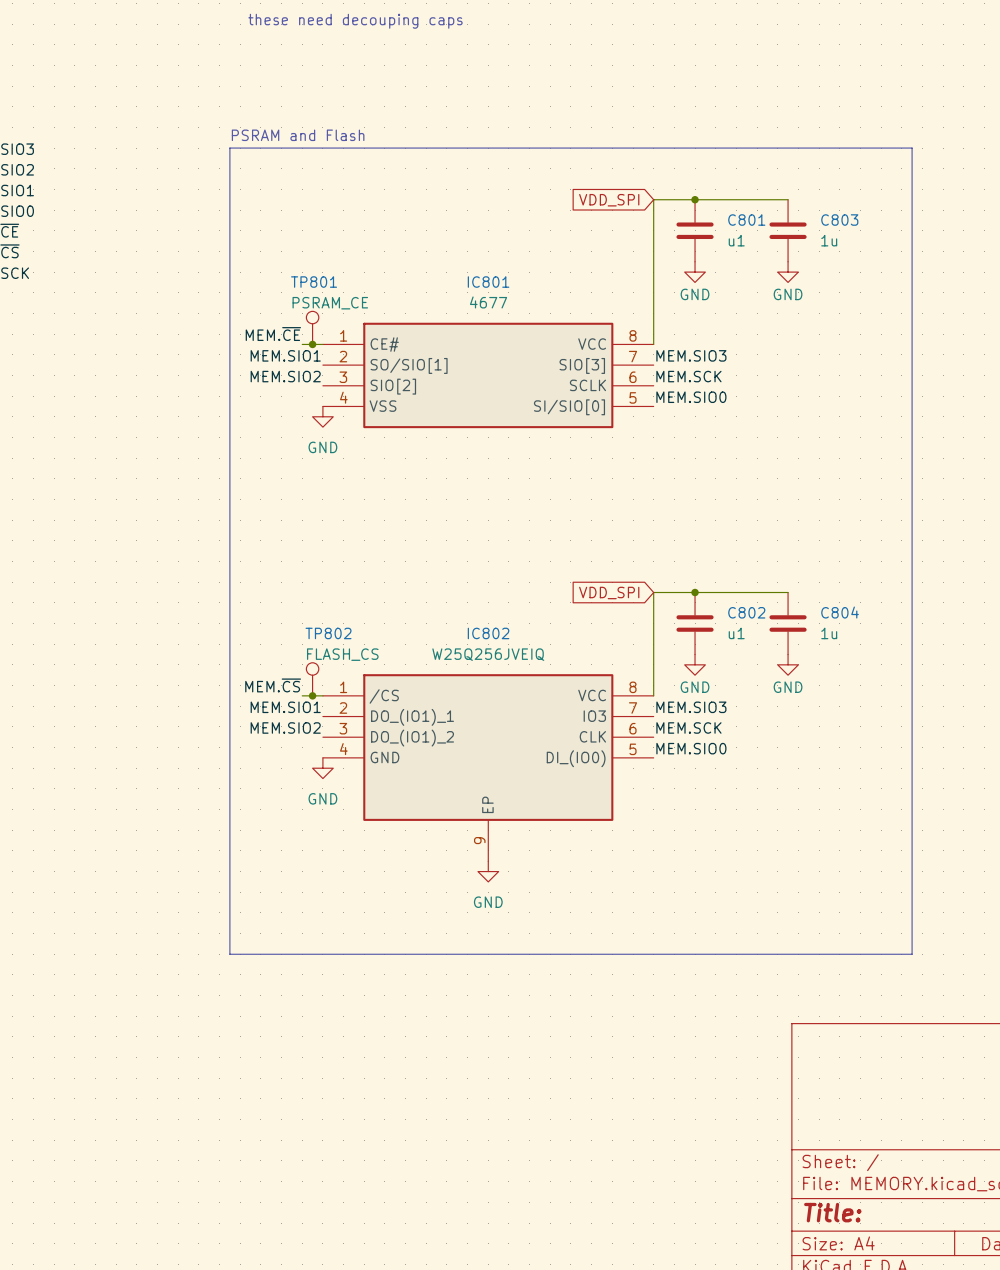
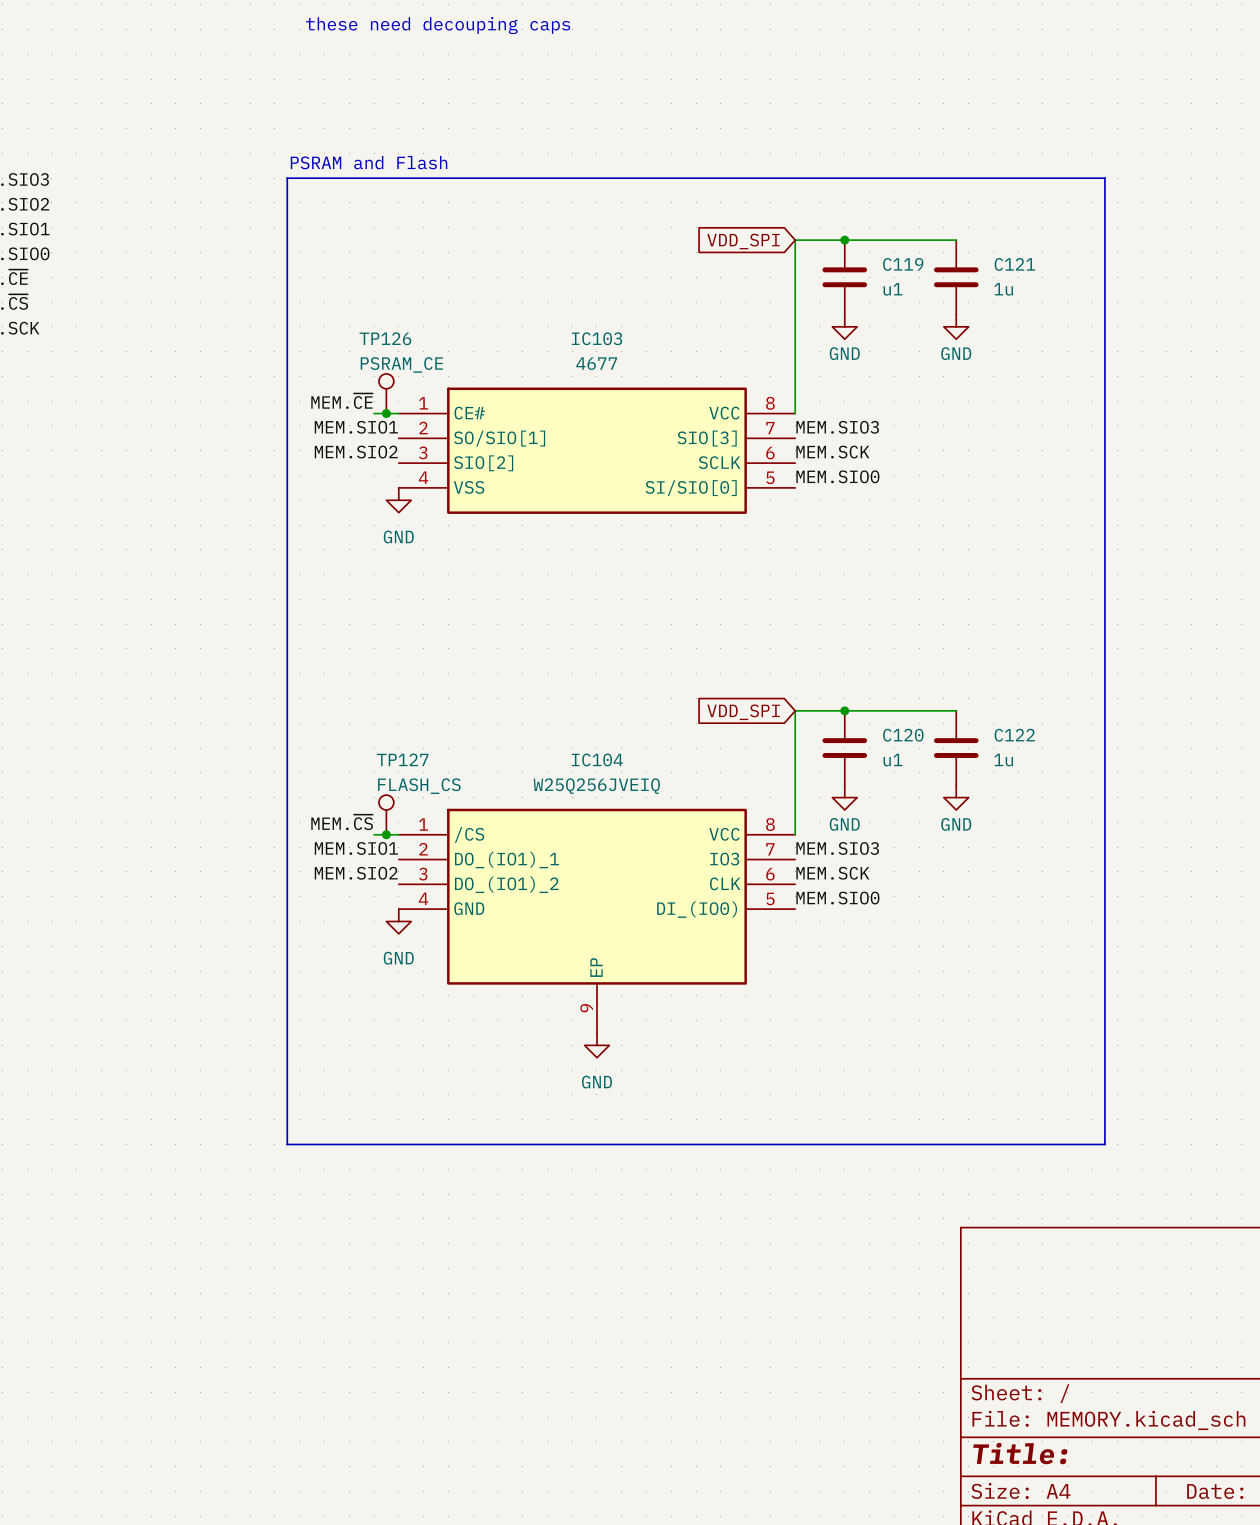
C801 name: C801 (746, 220) -> C119 (903, 264)
C803 name: C803 (839, 220) -> C121 (1014, 264)
TP801 name: TP801 (314, 282) -> TP126 (385, 338)
IC801 name: IC801 (488, 282) -> IC103 (597, 338)
C802 name: C802 (746, 612) -> C120 (903, 735)
C804 name: C804 (840, 612) -> C122 (1014, 735)
TP802 name: TP802 (328, 633) -> TP127 (402, 759)
IC802 name: IC802 (488, 633) -> IC104 (597, 759)

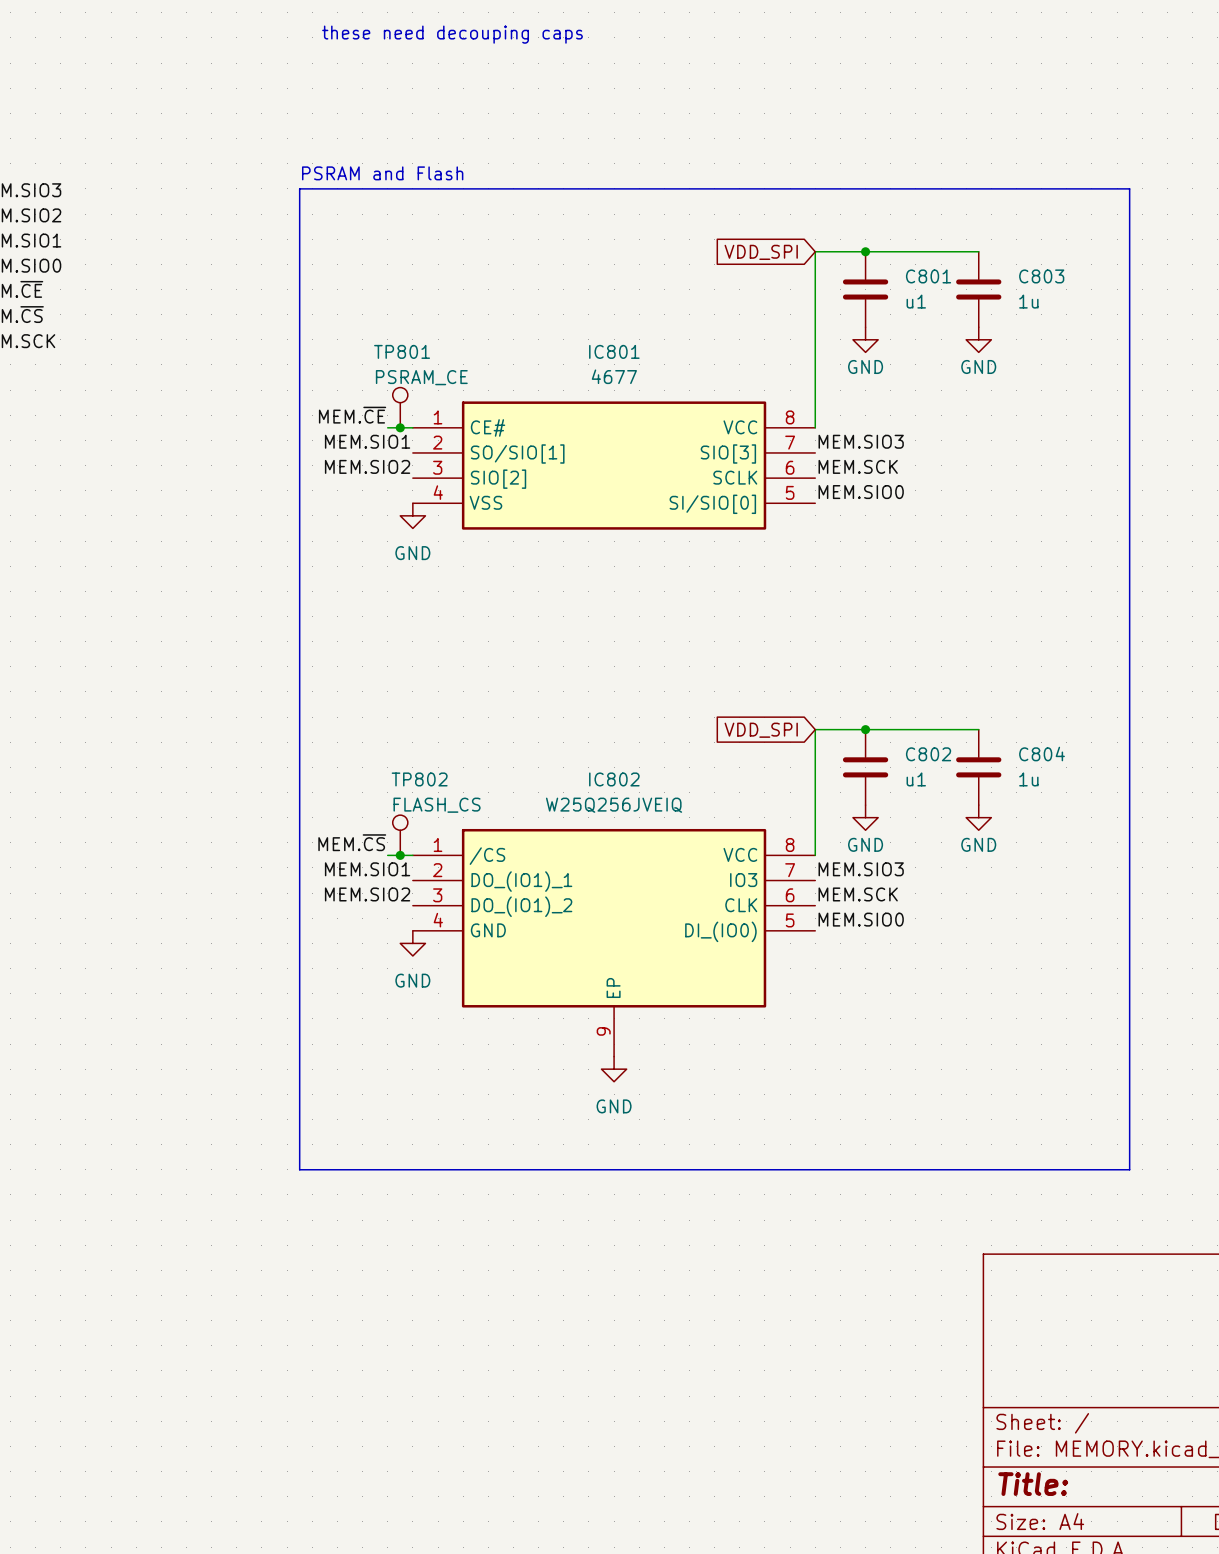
C119 name: C119 (903, 264) -> C801 (928, 276)
C121 name: C121 (1014, 264) -> C803 (1041, 276)
TP126 name: TP126 (385, 338) -> TP801 (402, 351)
IC103 name: IC103 (597, 338) -> IC801 (614, 351)
C120 name: C120 (903, 735) -> C802 (928, 754)
C122 name: C122 (1014, 735) -> C804 (1042, 754)
TP127 name: TP127 (402, 759) -> TP802 (419, 779)
IC104 name: IC104 (597, 759) -> IC802 (614, 779)

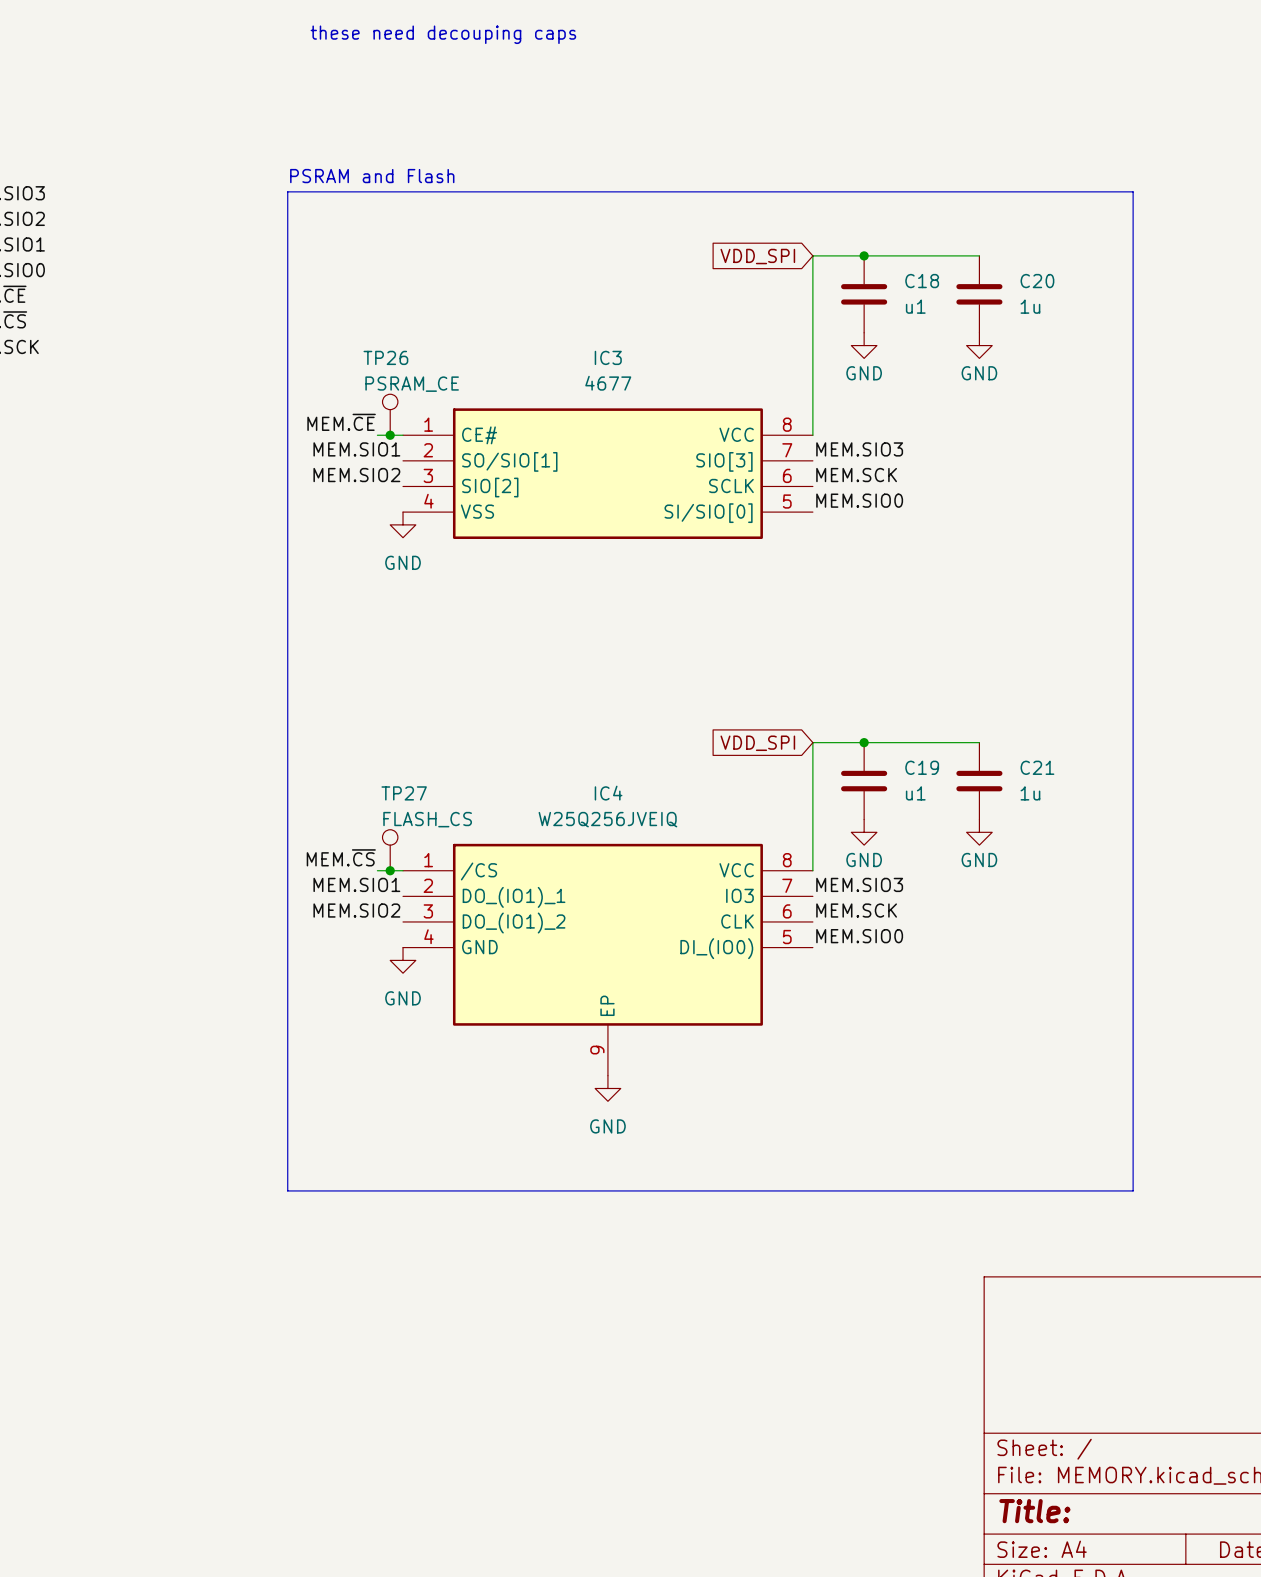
C801 name: C801 (928, 276) -> C18 (922, 281)
C803 name: C803 (1041, 276) -> C20 (1037, 281)
TP801 name: TP801 (402, 351) -> TP26 (385, 357)
IC801 name: IC801 (614, 351) -> IC3 (608, 357)
C802 name: C802 (928, 754) -> C19 (922, 767)
C804 name: C804 (1042, 754) -> C21 (1037, 767)
TP802 name: TP802 (419, 779) -> TP27 (404, 793)
IC802 name: IC802 (614, 779) -> IC4 (608, 793)

